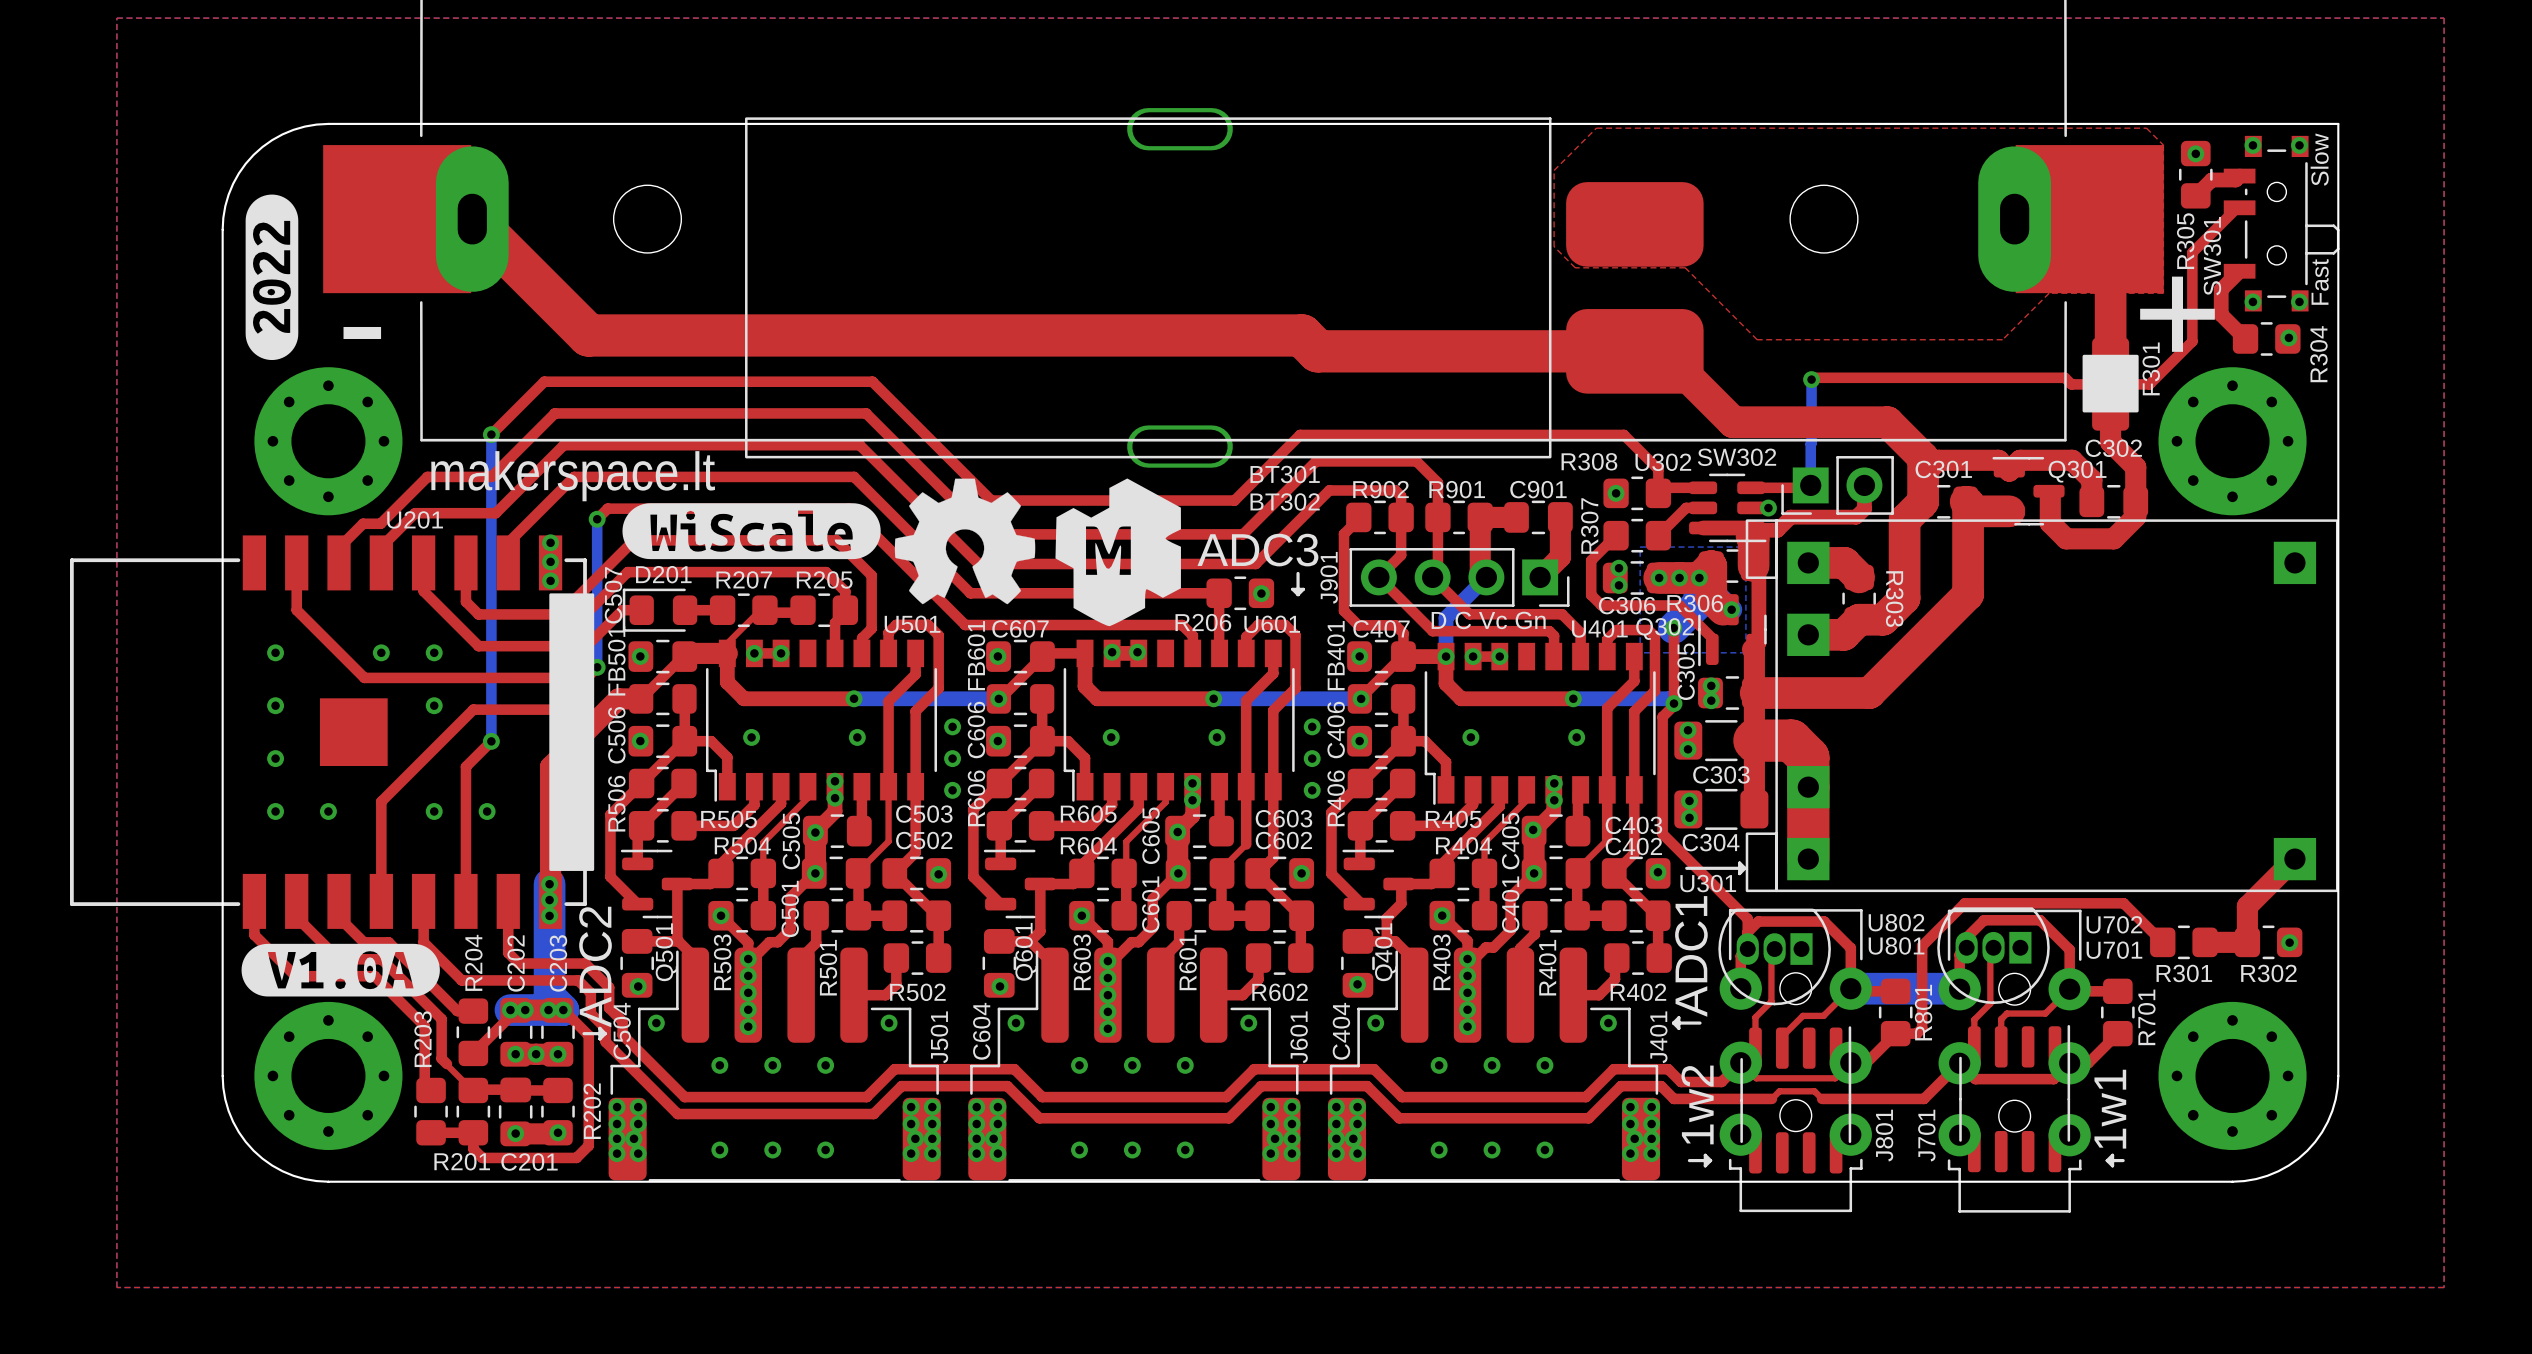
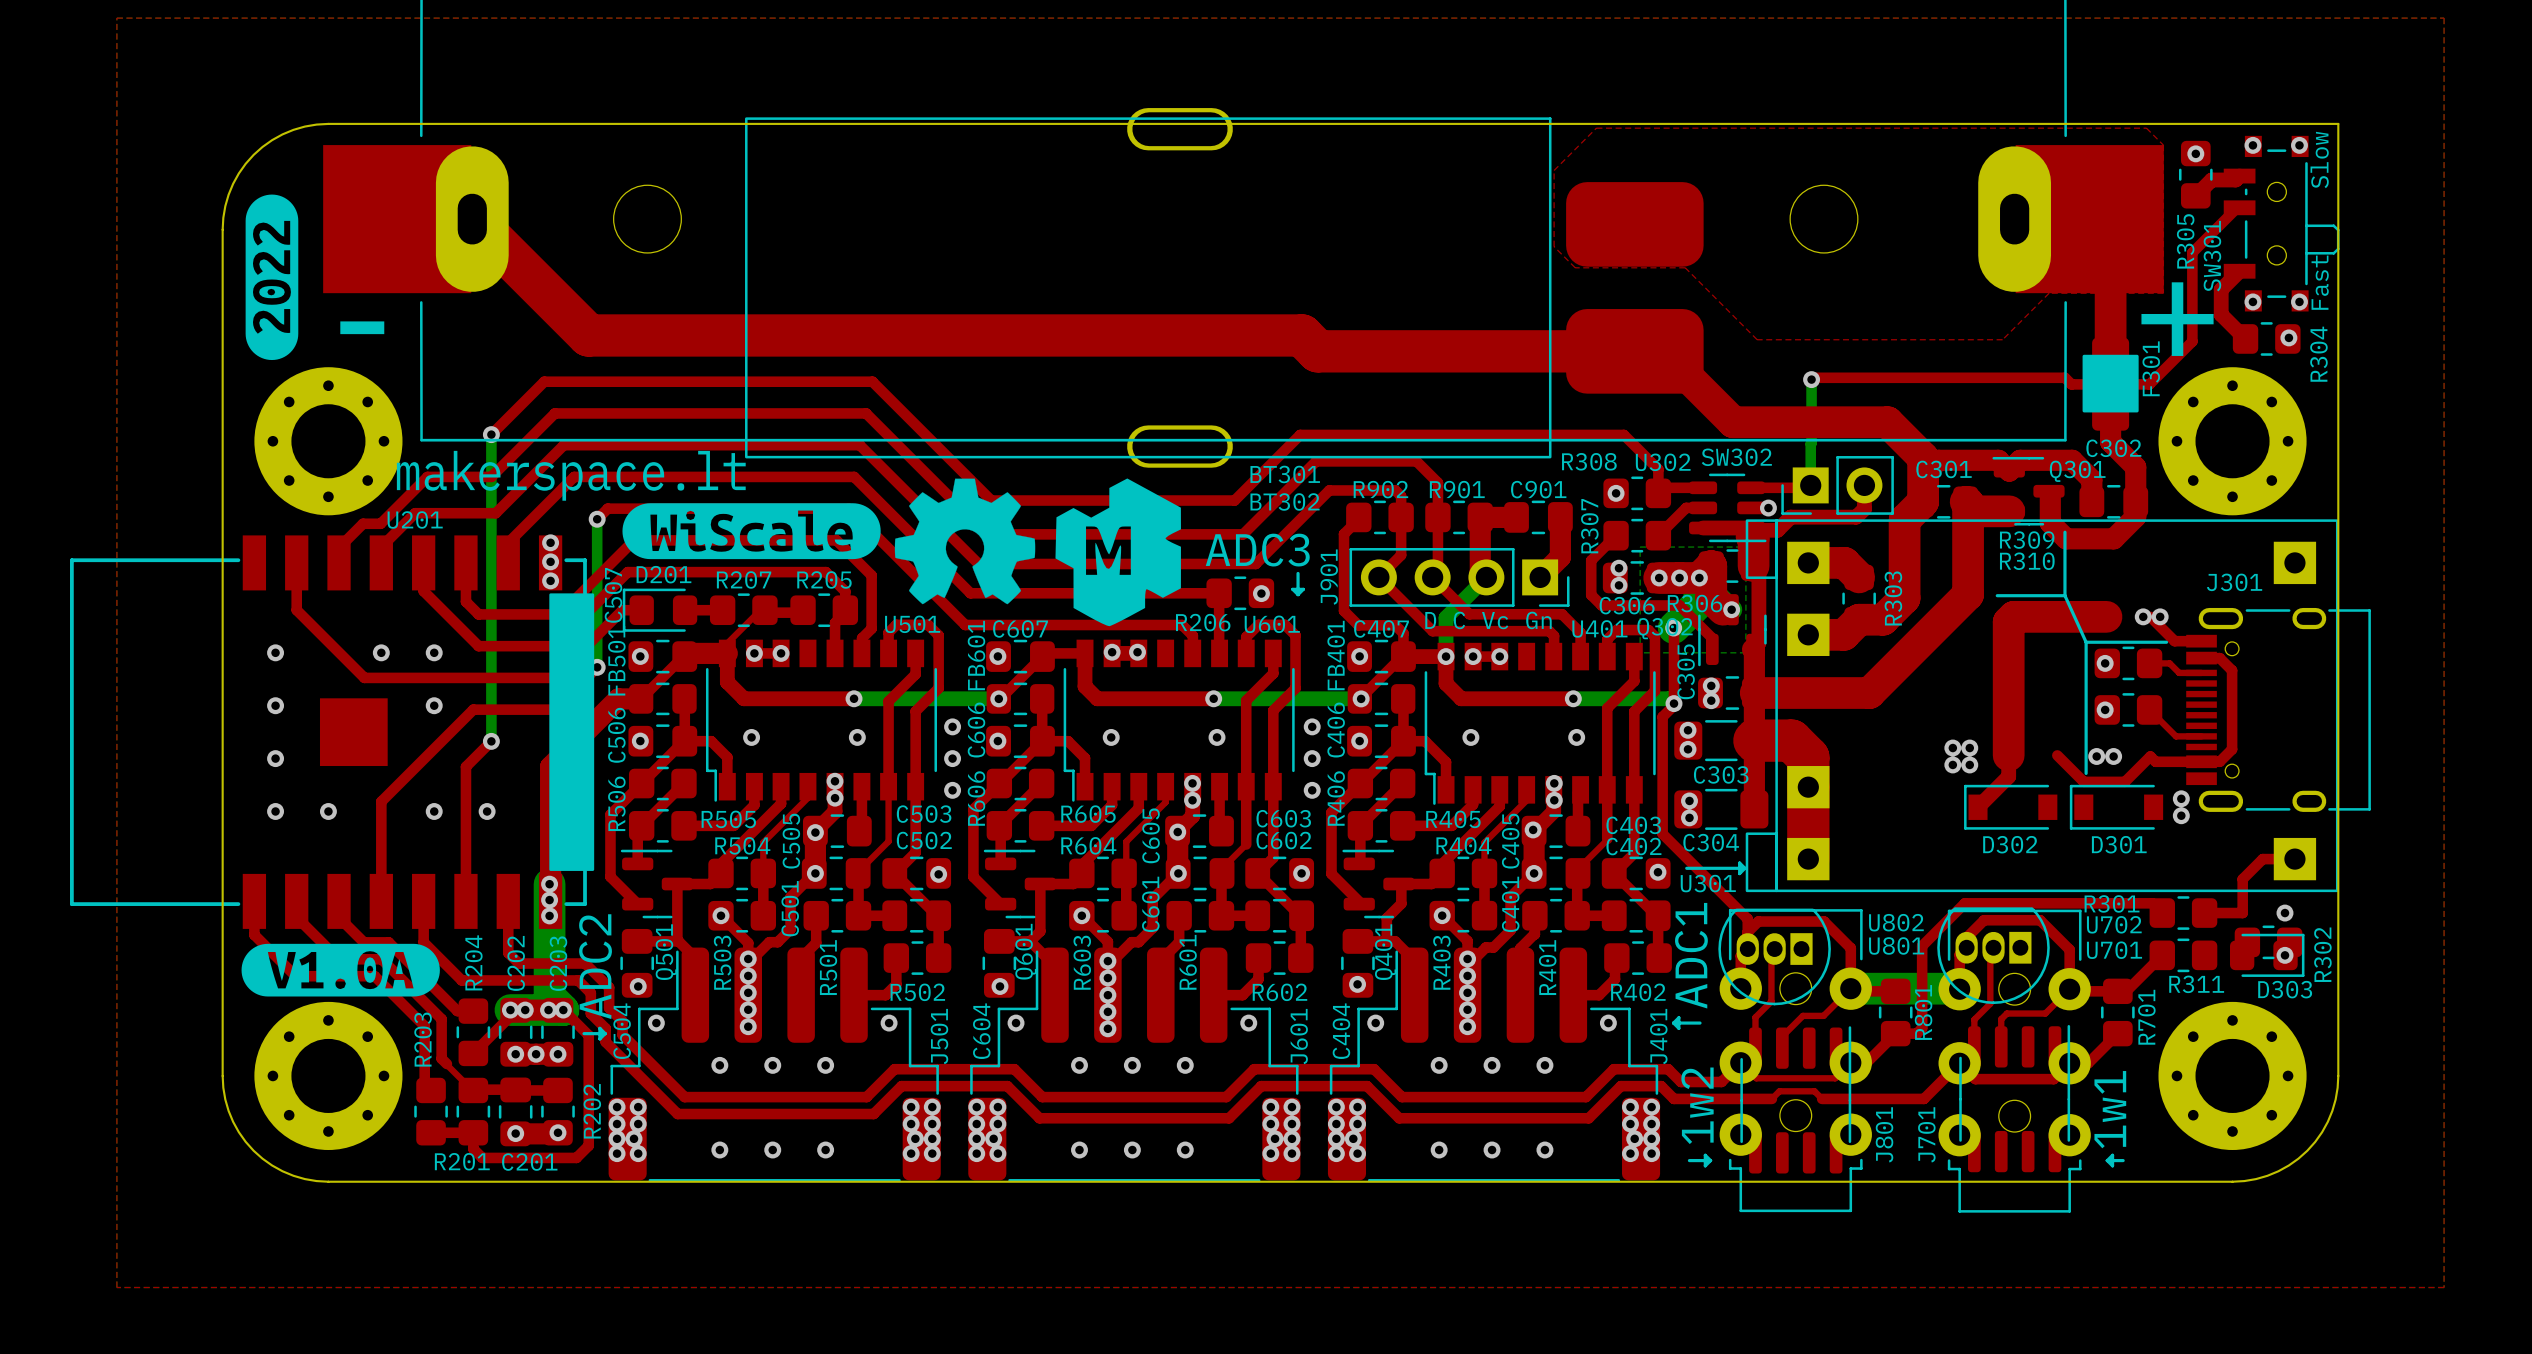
line: none -> (2064, 532) (2064, 595)
line: none -> (1997, 595) (2064, 595)
line: none -> (2064, 595) (2086, 642)
R303 name rotation: 0° (1894, 599) -> 180° (1893, 598)
top track: none -> (2106, 616) (2013, 616) (2008, 622) (2008, 776) (1978, 807)
via: none -> (2143, 616)
top track: none -> (2150, 616) (2174, 641) (2201, 641)
via: none -> (2160, 616)
line: none -> (2086, 642) (2086, 773)
line: none -> (2086, 642) (2166, 642)
top track: none -> (2201, 658) (2219, 658) (2232, 670) (2232, 749) (2219, 761) (2155, 761) (2150, 756) (2125, 781) (2083, 781) (2057, 755)
via: none -> (2105, 663)
R309: none -> (2128, 663)
top track: none -> (2149, 663) (2169, 663) (2179, 672) (2201, 672)
via: none -> (2105, 709)
R310: none -> (2128, 709)
top track: none -> (2149, 709) (2176, 736) (2201, 736)
J301: none -> (2278, 709)
via: none -> (1952, 748)
via: none -> (1969, 748)
via: none -> (2096, 756)
via: none -> (2113, 756)
via: none -> (1952, 764)
via: none -> (1969, 764)
via: none -> (2181, 798)
D302: none -> (2010, 807)
D301: none -> (2116, 807)
via: none -> (2181, 815)
top track: (2294, 859) (2247, 906) (2247, 942) (2205, 942) -> (2294, 859) (2262, 859) (2242, 879) (2242, 913) (2204, 913)
top track: (2123, 903) (2162, 942) -> (2123, 903) (2152, 903) (2162, 913)
via: none -> (2284, 913)
R301 position: (2183, 942) -> (2183, 913)
via position: (2289, 942) -> (2284, 955)
top track: none -> (2162, 955) (2126, 991) (2117, 991)
R311: none -> (2183, 955)
D303: none -> (2267, 955)
R301 name position: R301 (2184, 973) -> R301 (2112, 903)
R302 name rotation: 0° (2268, 973) -> 90° counterclockwise (2322, 954)

